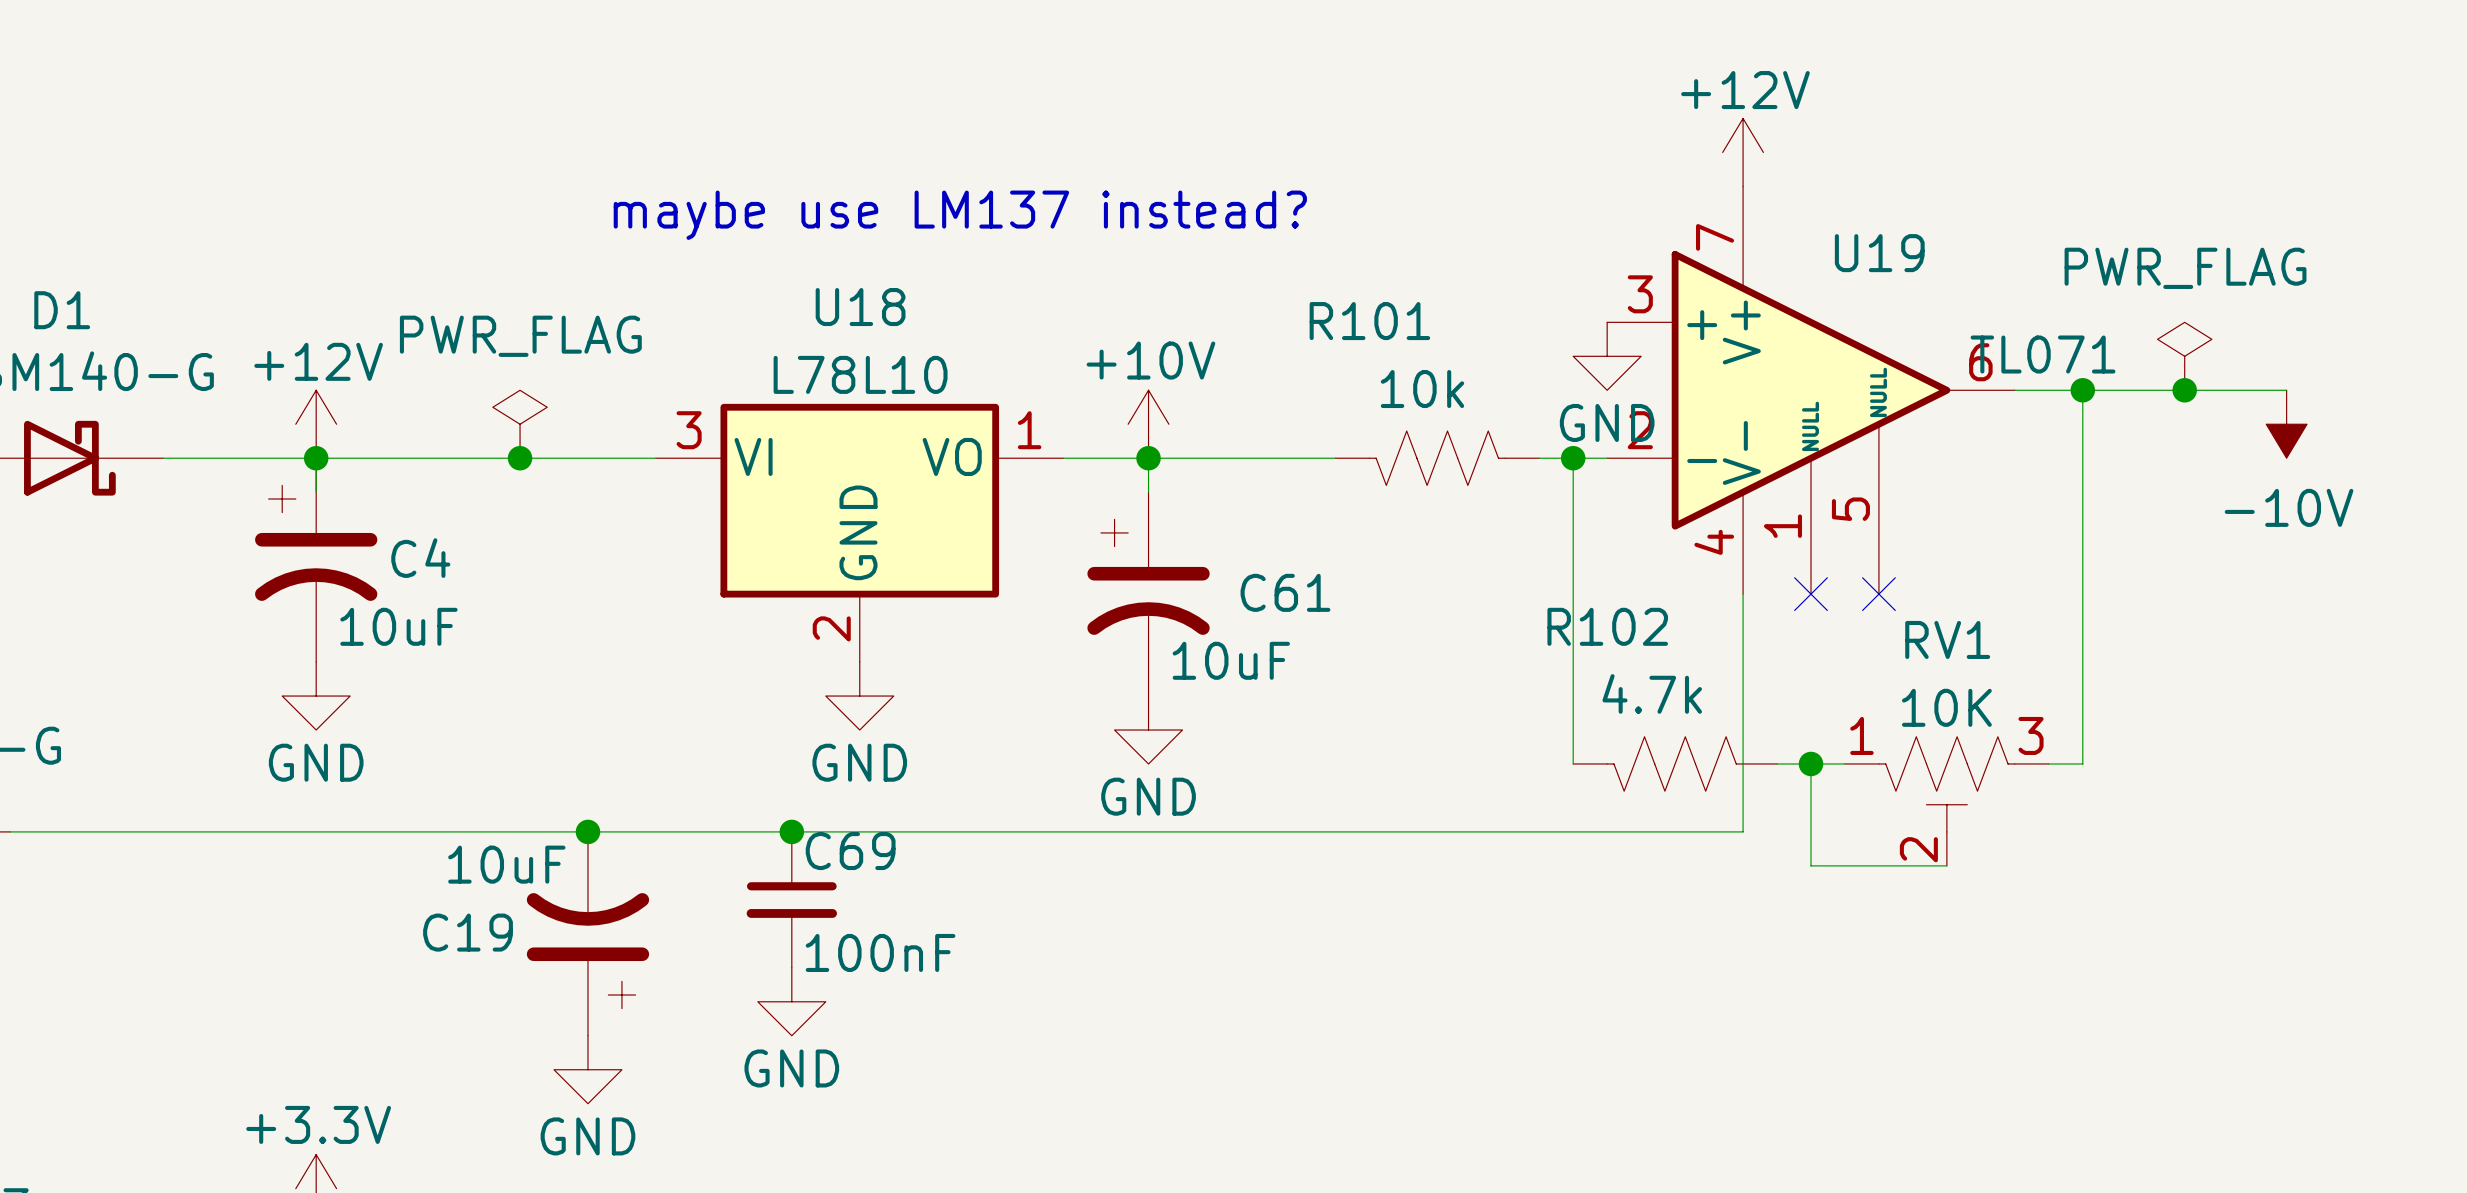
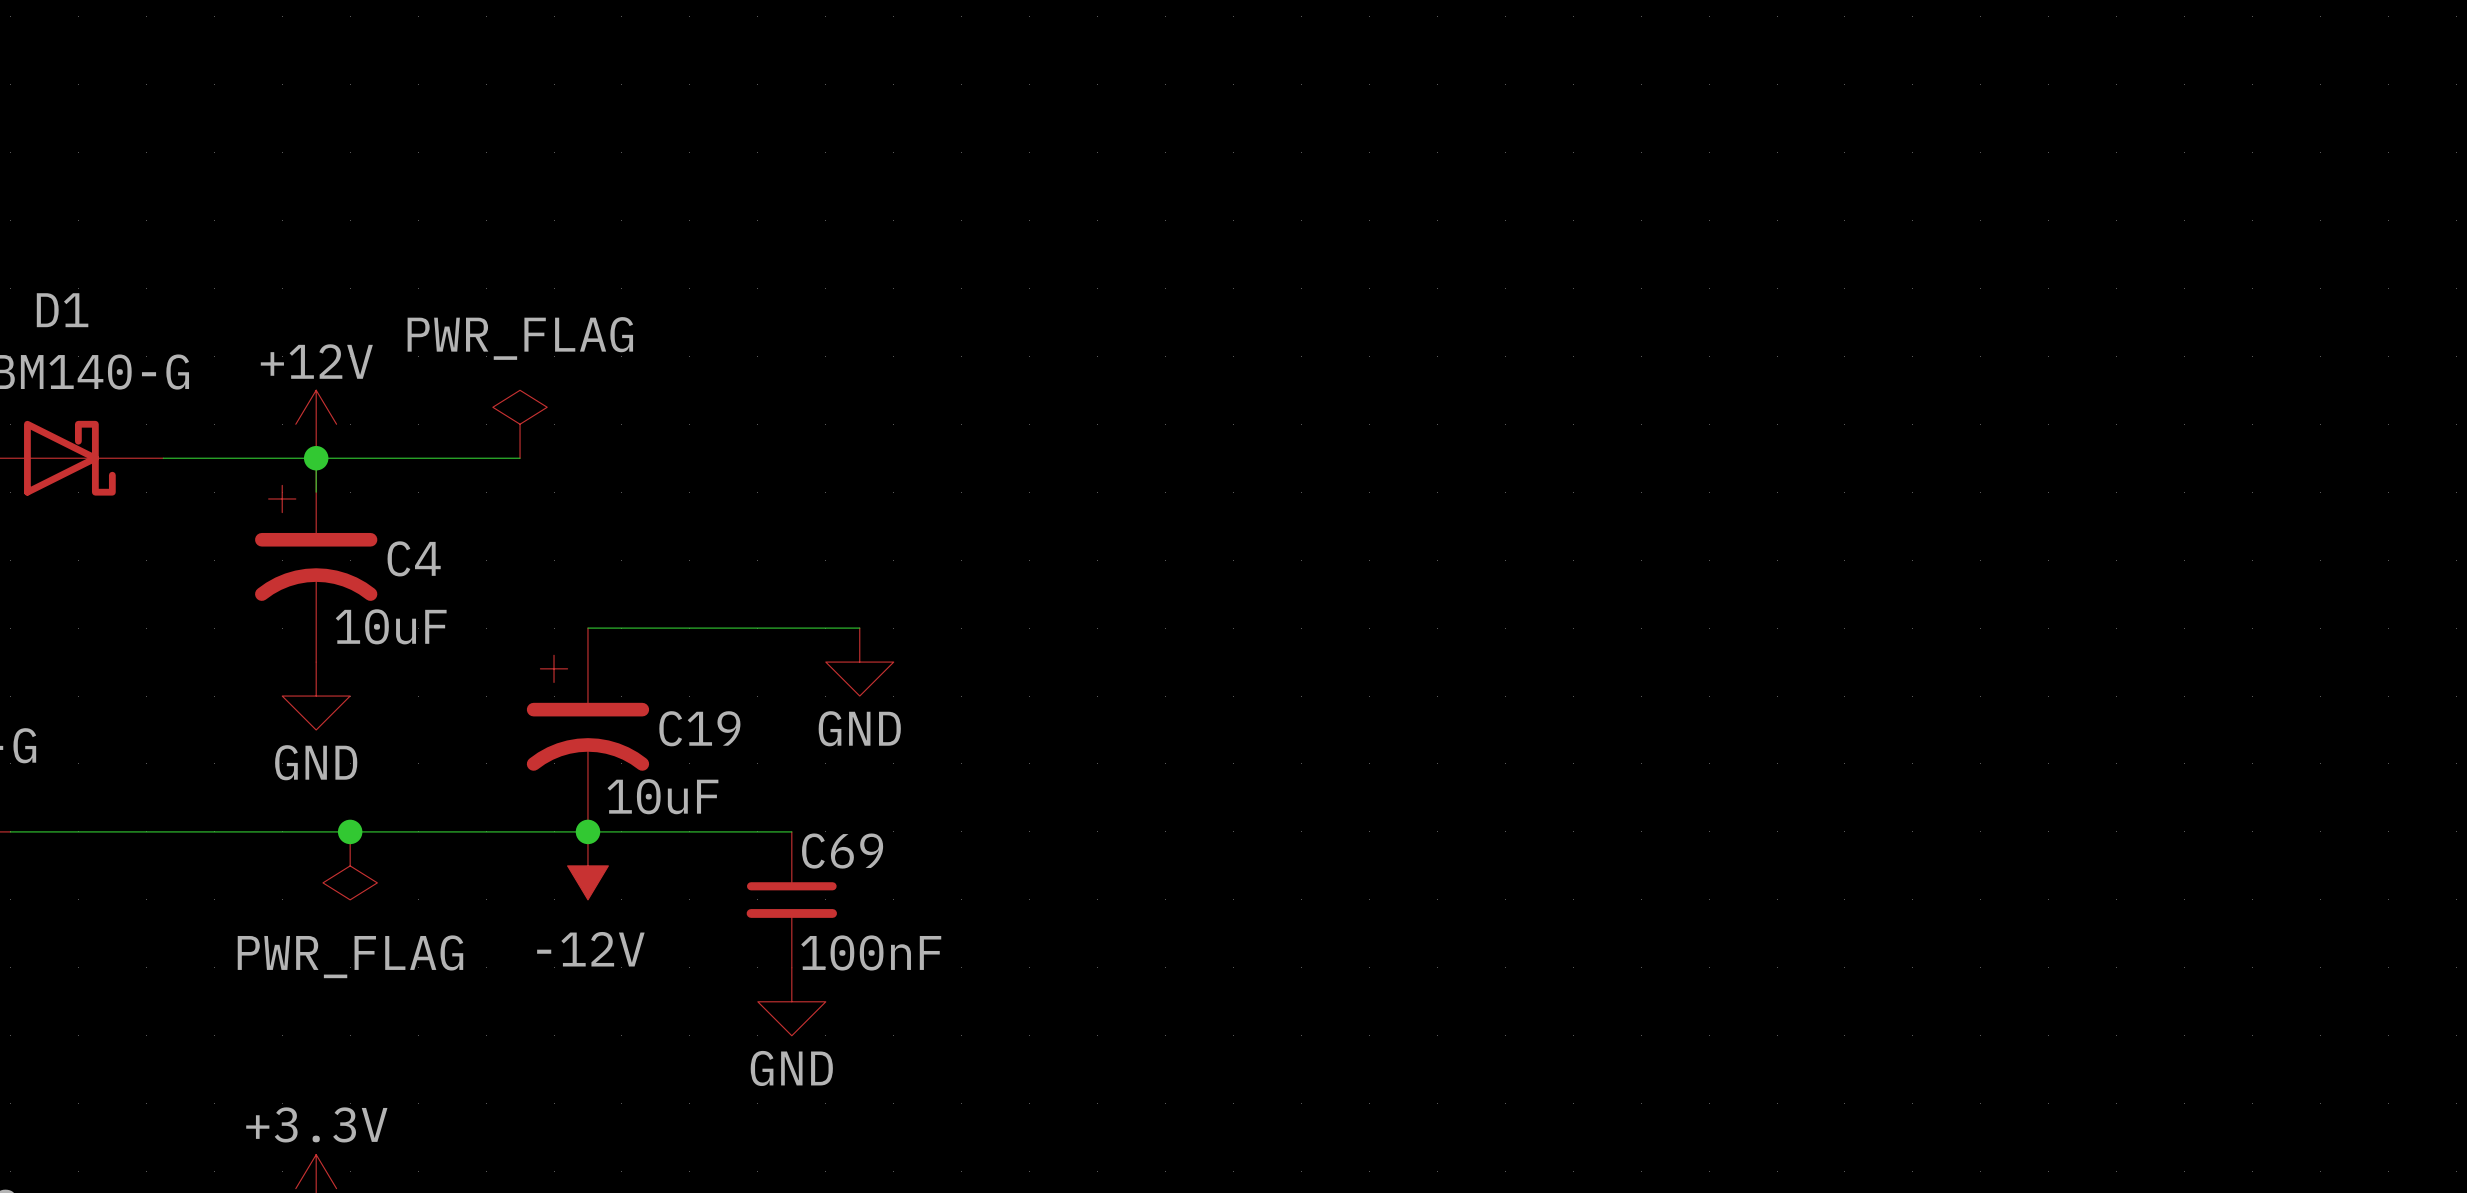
power symbol: +12V (1743, 152) -> none
text: maybe use LM137 instead? (960, 215) -> none
power symbol: GND (1607, 356) -> none
power symbol: PWR_FLAG (2184, 356) -> none
U19: TL071 (1811, 390) -> none
wire: (2014, 390) (2286, 390) -> none
wire: (2082, 390) (2082, 763) (2048, 763) -> none
junction: (2082, 390) -> none
junction: (2184, 390) -> none
power symbol: +10V (1148, 424) -> none
power symbol: -10V (2286, 424) -> none
wire: (520, 458) (655, 458) -> none
junction: (520, 458) -> none
wire: (1063, 458) (1335, 458) -> (587, 628) (859, 628)
wire: (1148, 458) (1148, 492) -> none
junction: (1148, 458) -> none
R101: 10k (1437, 458) -> none
wire: (1539, 458) (1607, 458) -> none
wire: (1573, 458) (1573, 763) -> none
junction: (1573, 458) -> none
U18: L78L10 (859, 532) -> none
C61: 10uF (1148, 594) -> none
wire: (1743, 594) (1743, 831) (791, 831) -> none
no-connect mark: (1811, 594) -> none
no-connect mark: (1878, 594) -> none
power symbol position: GND (859, 696) -> GND (859, 662)
power symbol: GND (1148, 730) -> none
R102: 4.7k (1675, 763) -> none
wire: (1777, 763) (1844, 763) -> none
wire: (1811, 763) (1811, 865) (1946, 865) -> none
junction: (1811, 763) -> none
RV1: 10K (1946, 801) -> none
junction: none -> (350, 831)
junction: (791, 831) -> none
power symbol: none -> PWR_FLAG (350, 865)
power symbol: none -> -12V (587, 865)
C19 position: (587, 933) -> (587, 730)
C19 rotation: 0° (587, 950) -> 180° (587, 713)
power symbol: GND (587, 1069) -> none

